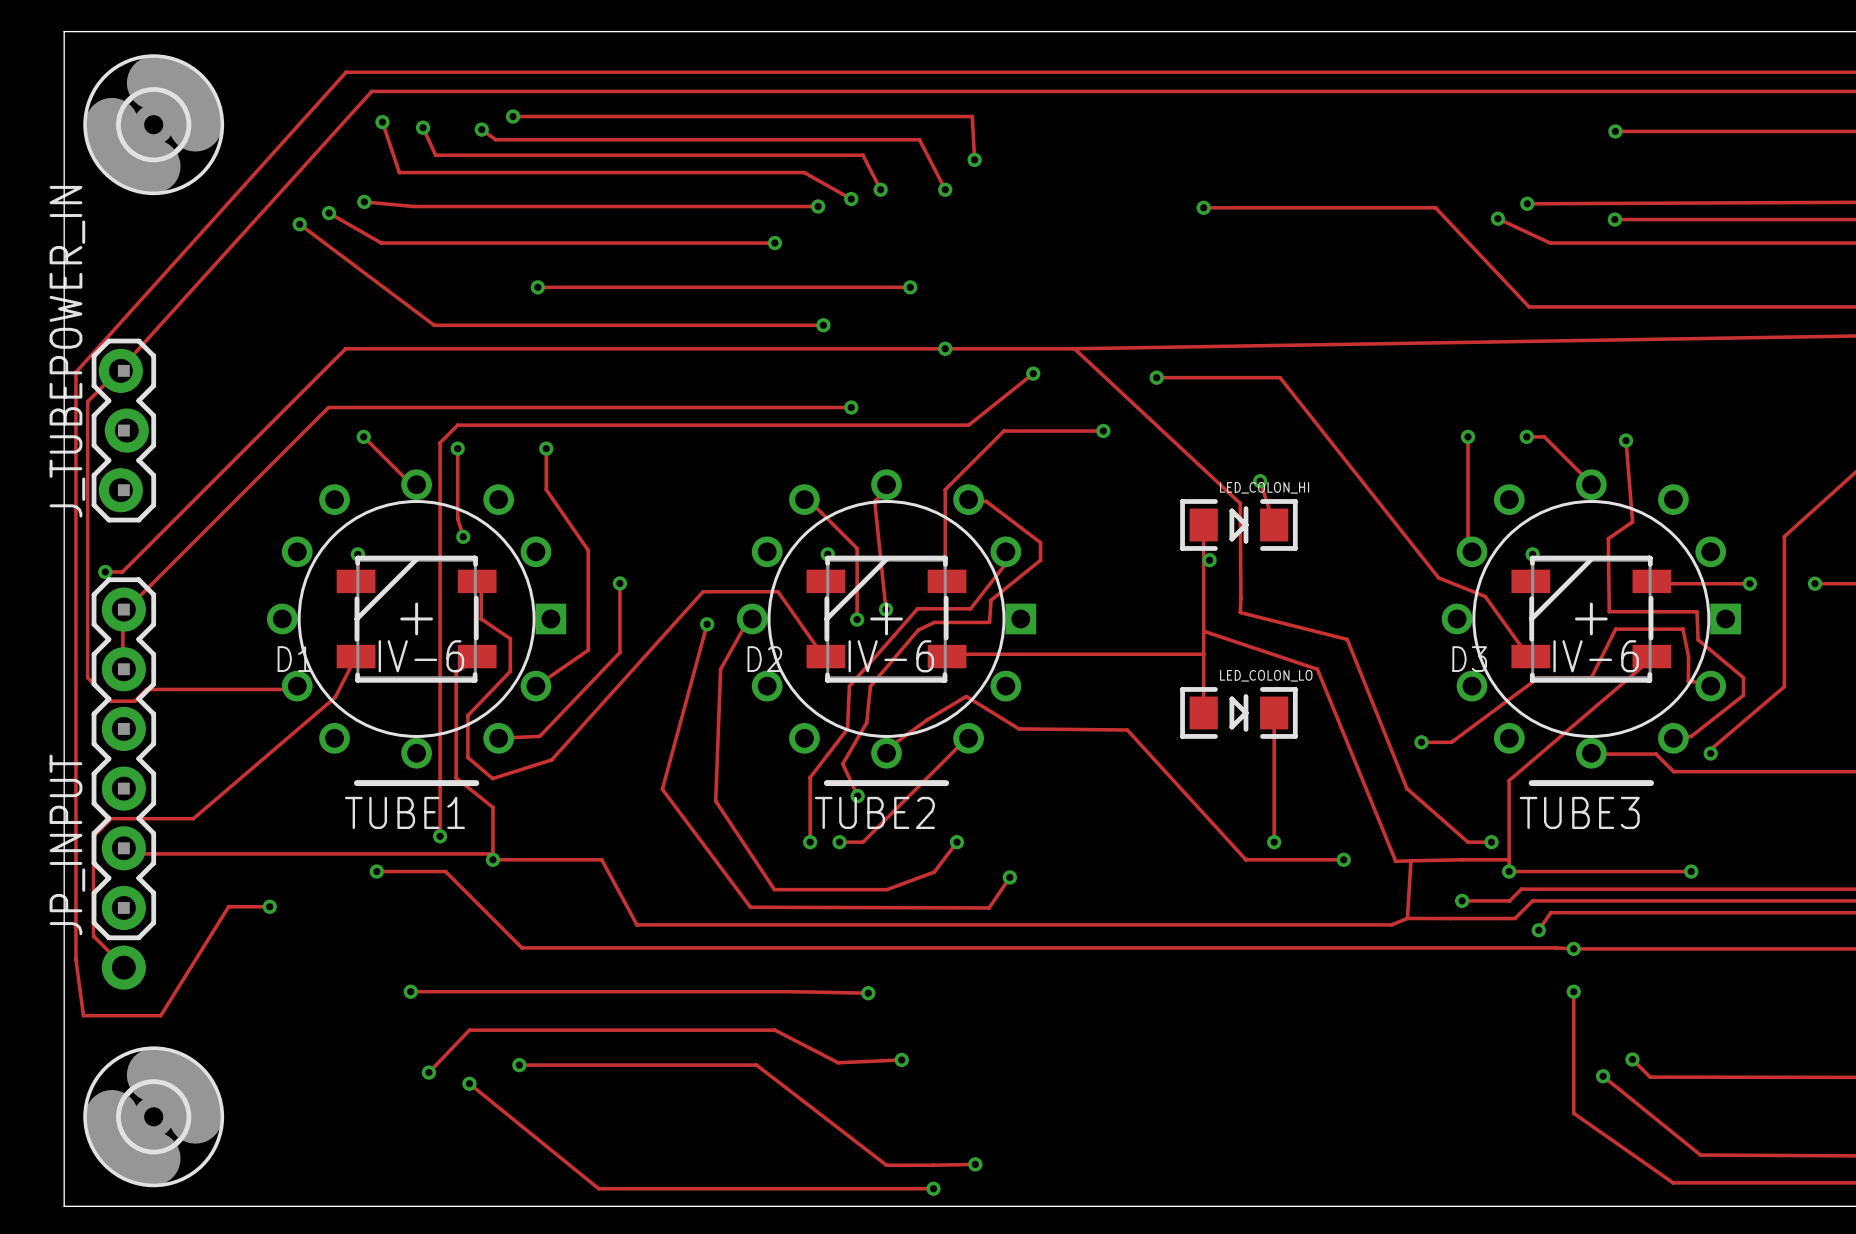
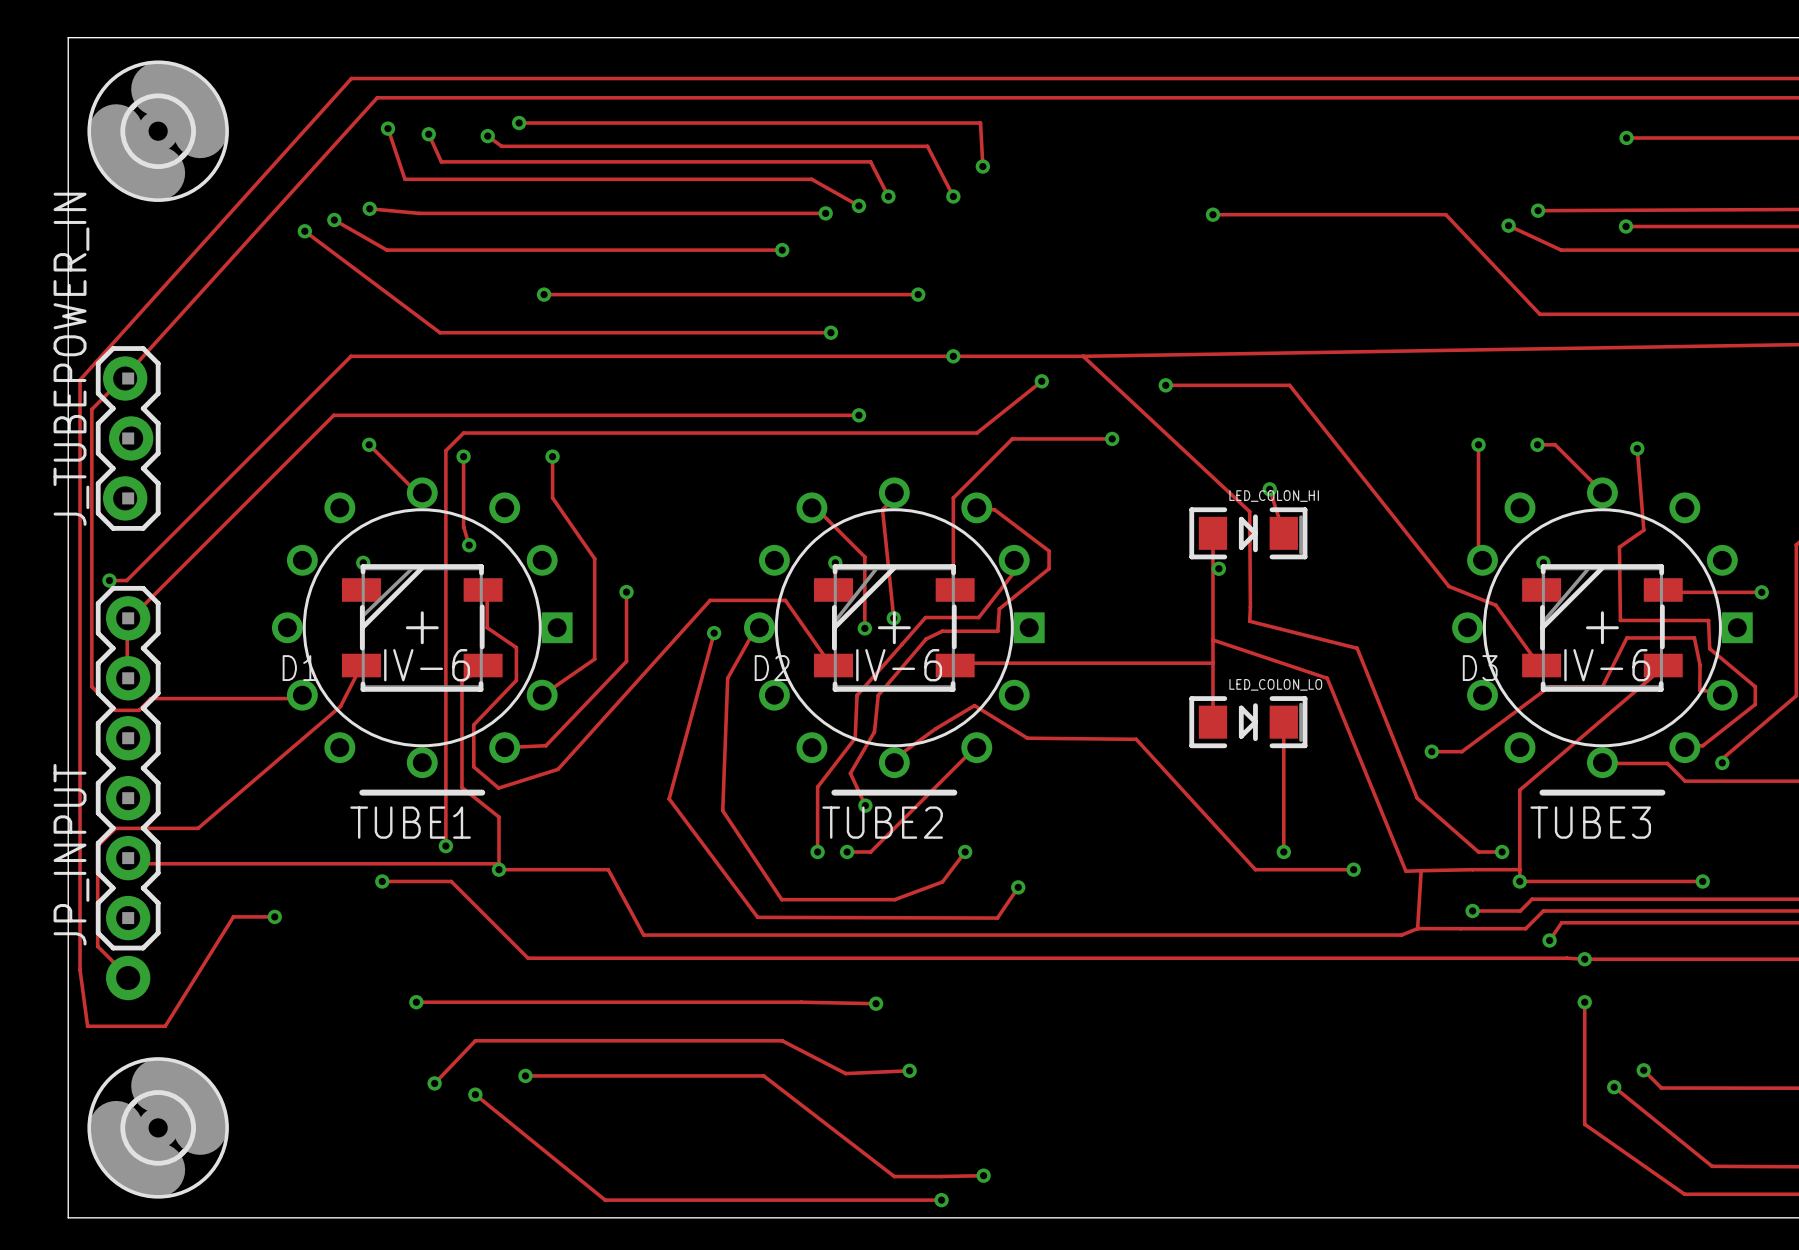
line: none -> (1300, 517) (1300, 552)
line: none -> (411, 569) (362, 616)
line: none -> (875, 569) (834, 622)
line: none -> (1587, 569) (1544, 620)
line: none -> (1300, 704) (1300, 740)

